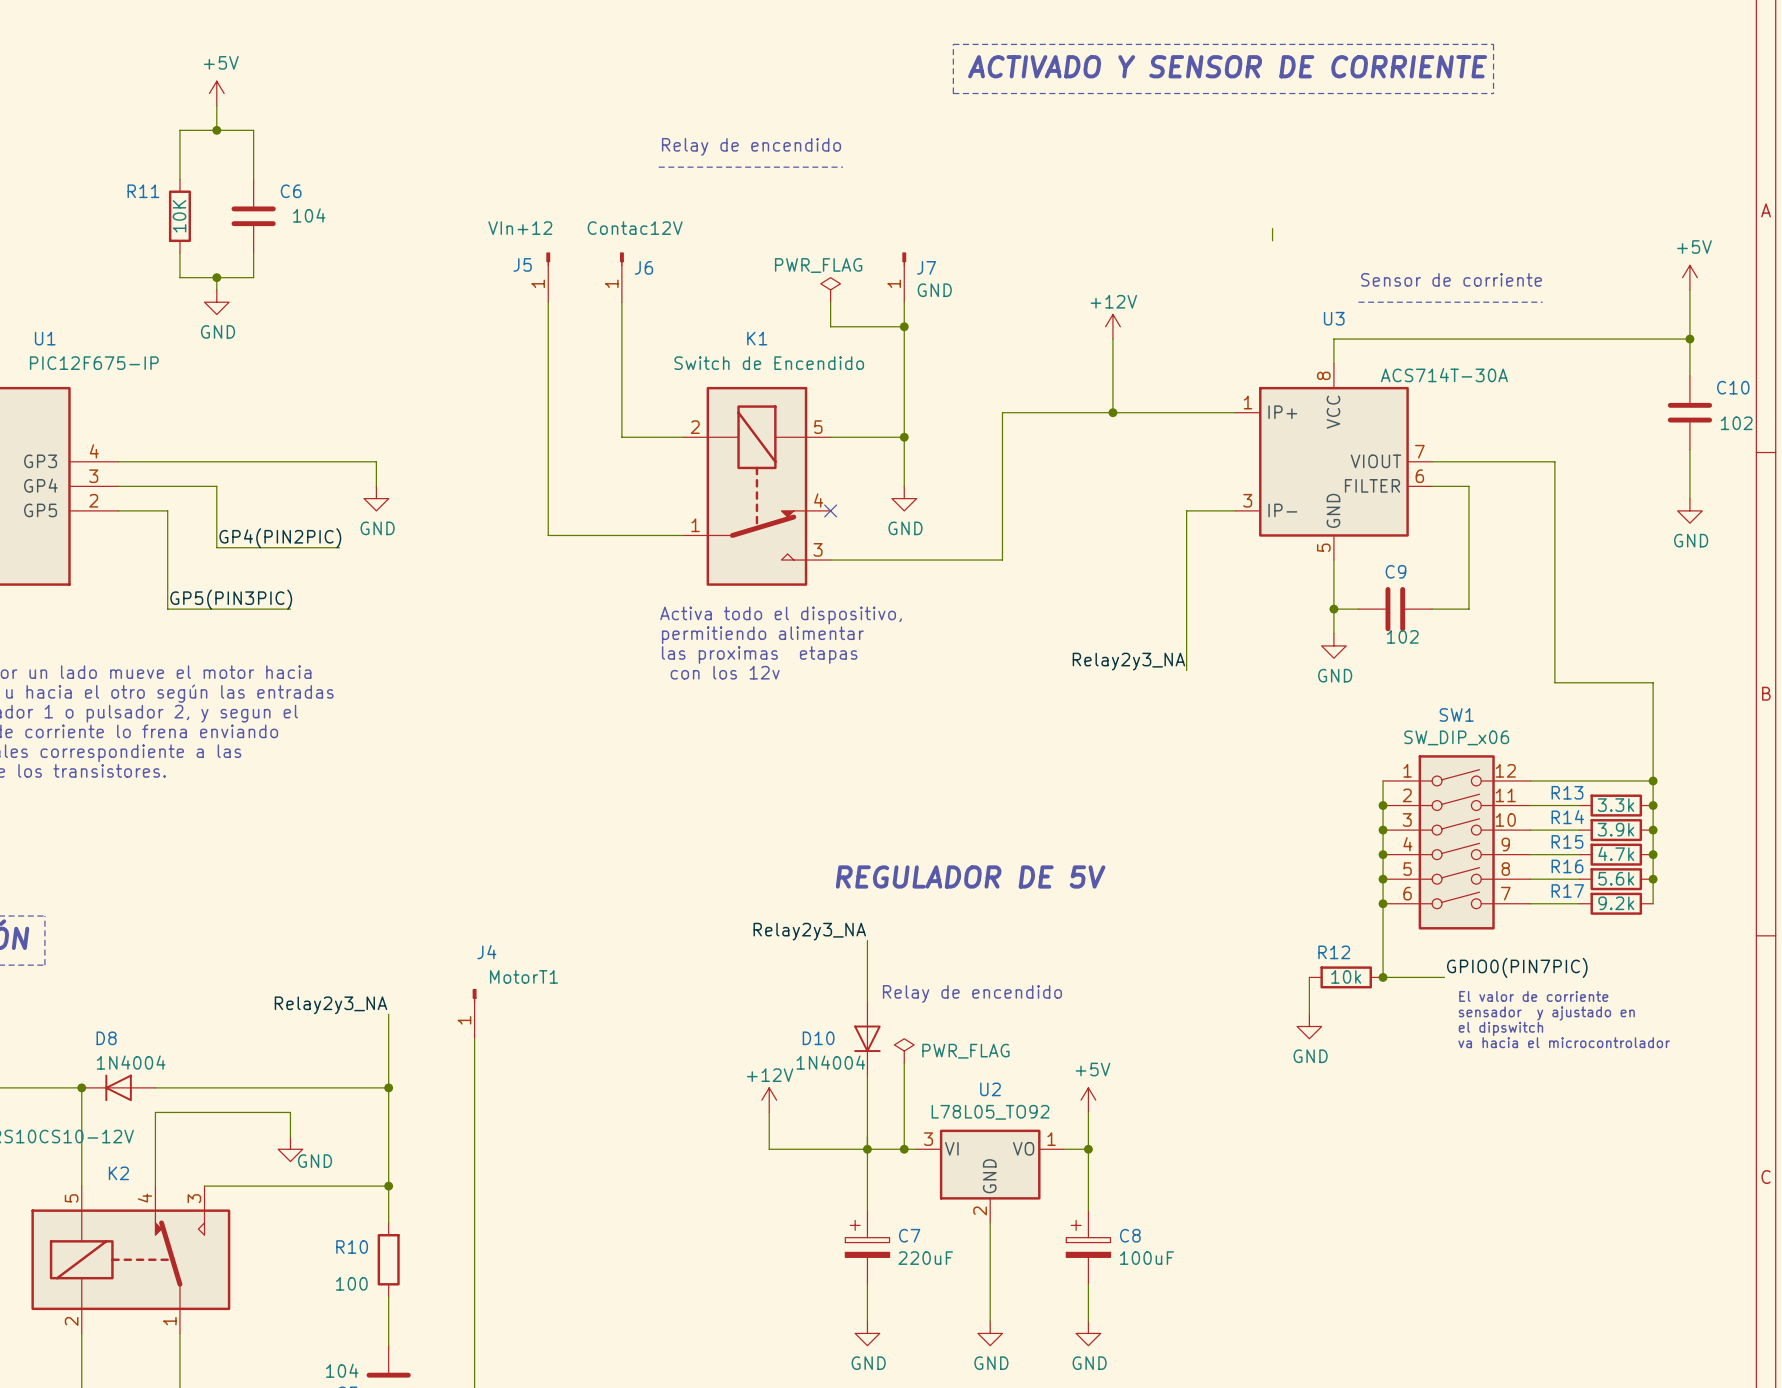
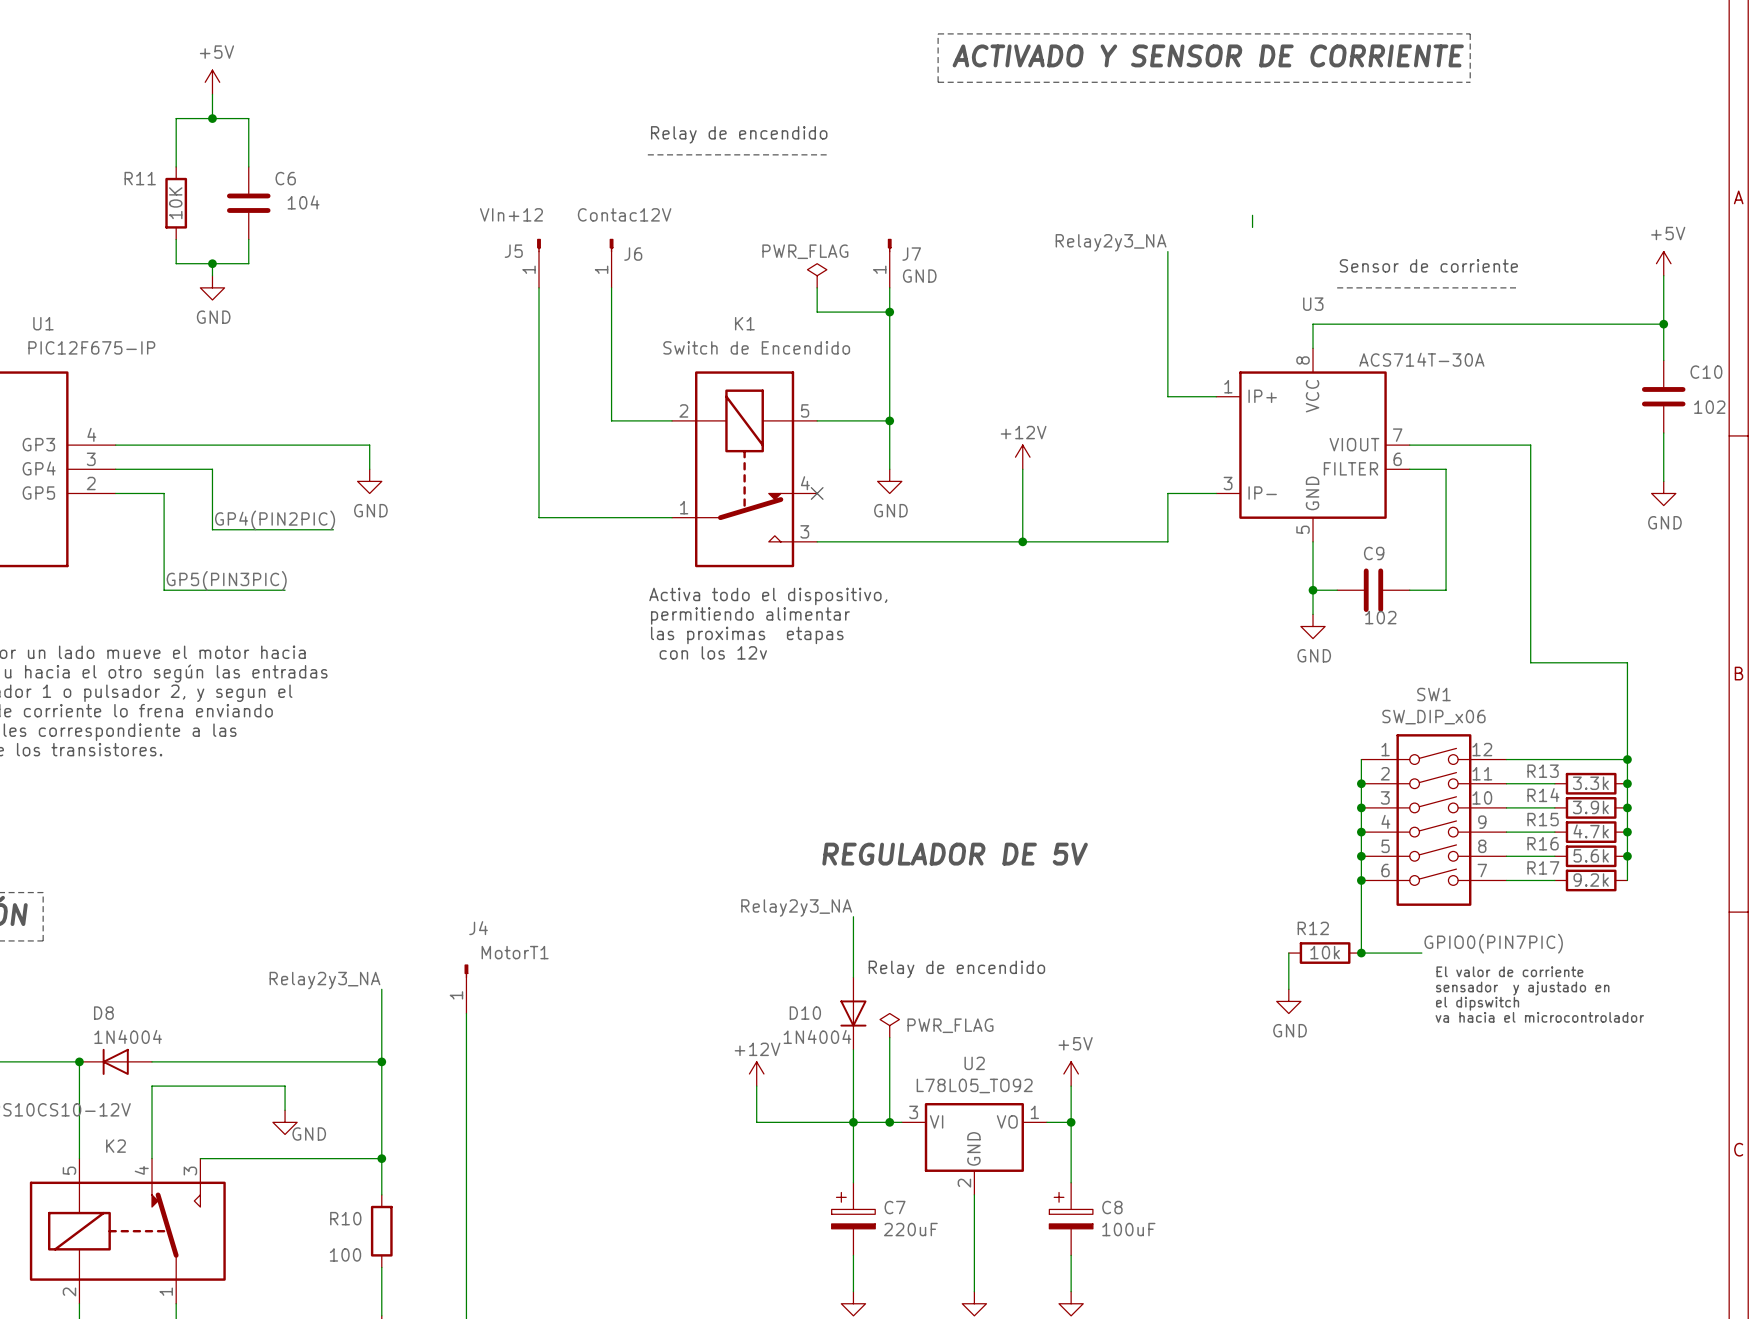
label: none -> Relay2y3_NA (1111, 242)
wire: none -> (1167, 251) (1167, 396)
power symbol position: +12V (1112, 326) -> +12V (1022, 457)
wire: (1112, 339) (1112, 412) -> (1022, 469) (1022, 541)
junction: (1112, 412) -> none
wire: (1186, 412) (1002, 412) (1002, 560) -> (1167, 541) (986, 541)
junction: none -> (1022, 541)
wire: (1186, 560) (1186, 670) -> none
label: Relay2y3_NA (1128, 661) -> none

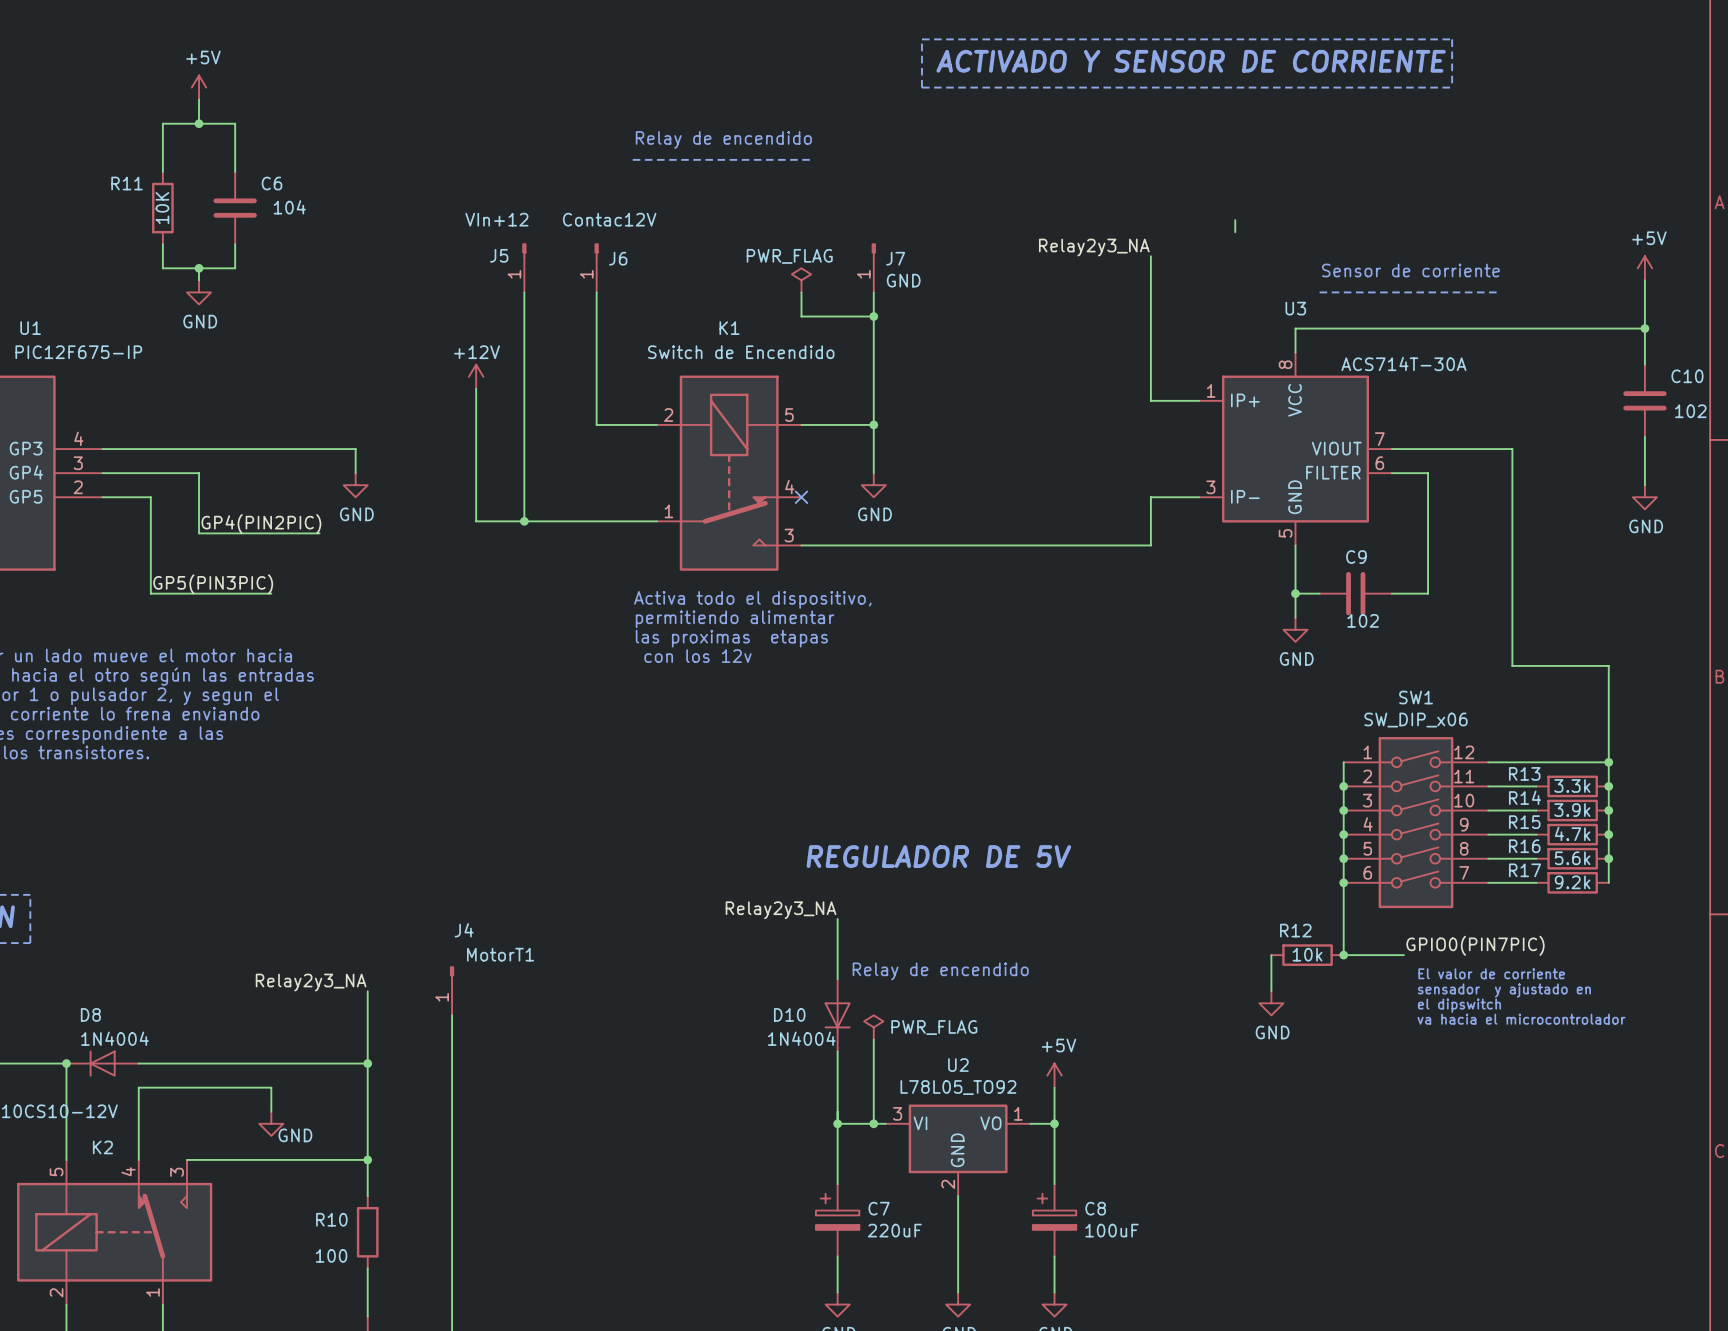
power symbol: none -> +12V (476, 376)
wire: none -> (476, 388) (476, 521) (524, 521)
power symbol: +12V (1022, 457) -> none
wire: (1022, 469) (1022, 541) -> none
junction: none -> (524, 521)
junction: (1022, 541) -> none
power symbol: +12V (756, 1073) -> none
wire: (756, 1086) (756, 1122) (853, 1122) -> none

